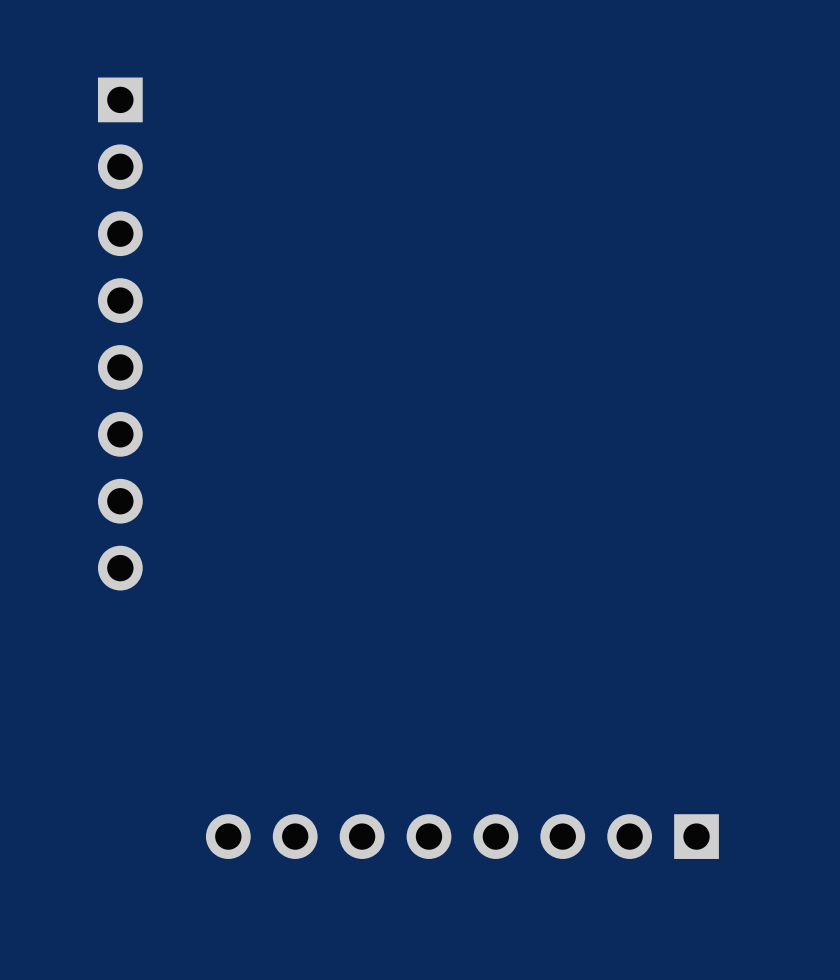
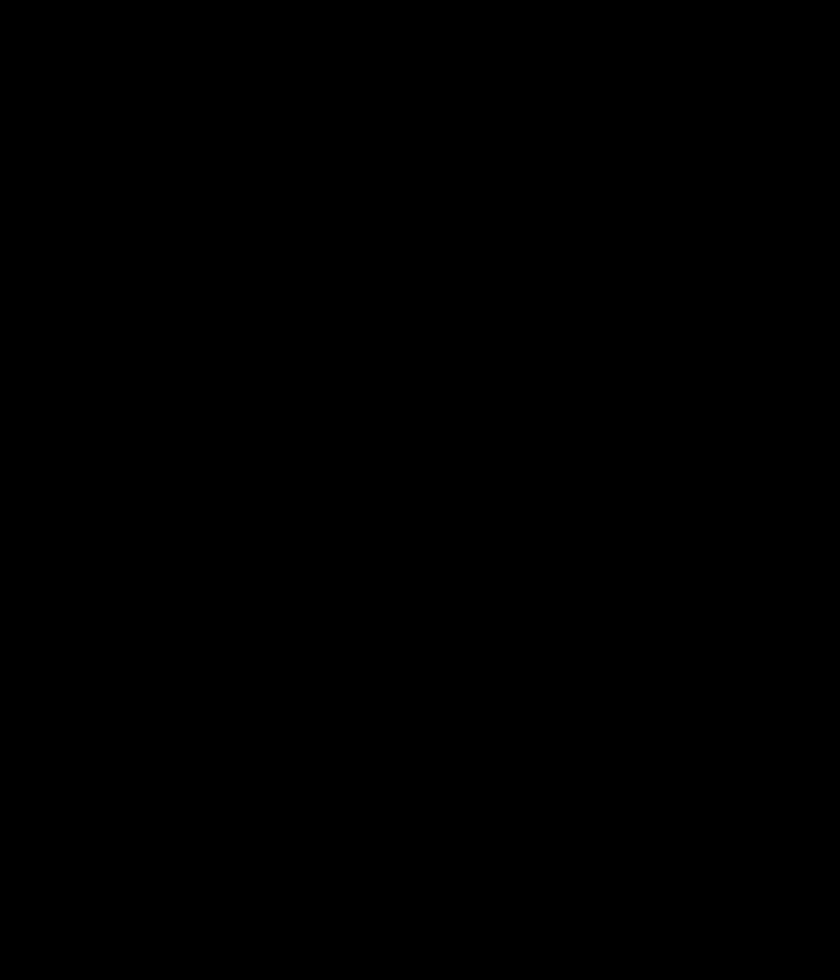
part: (120, 334) -> none
part: (462, 836) -> none

